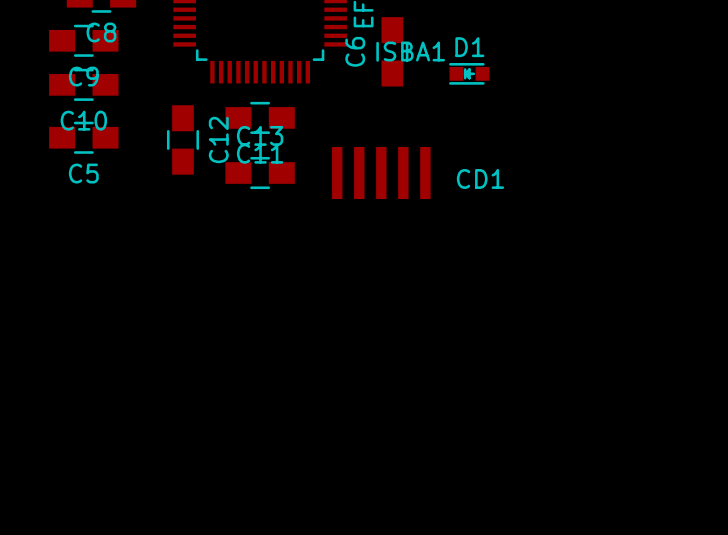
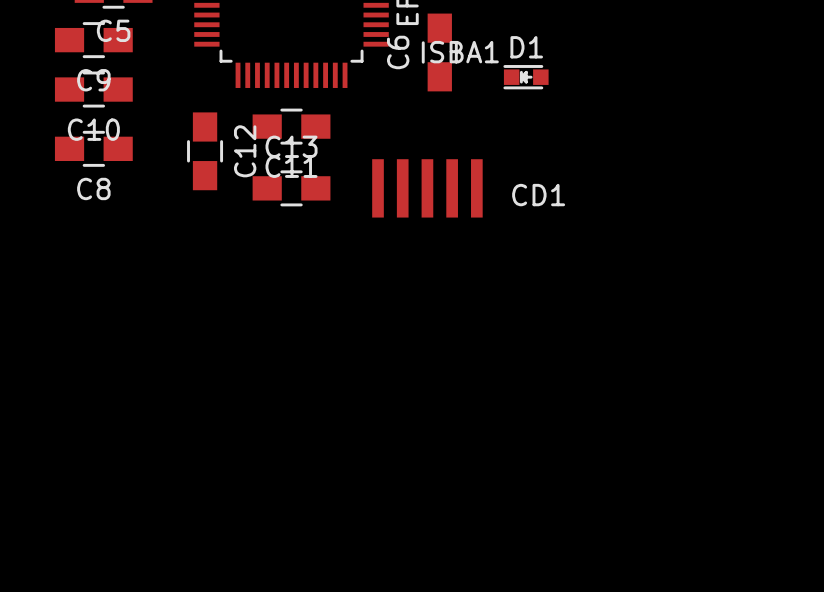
C8 name: C8 (101, 32) -> C5 (113, 30)
C5 name: C5 (83, 173) -> C8 (93, 188)

